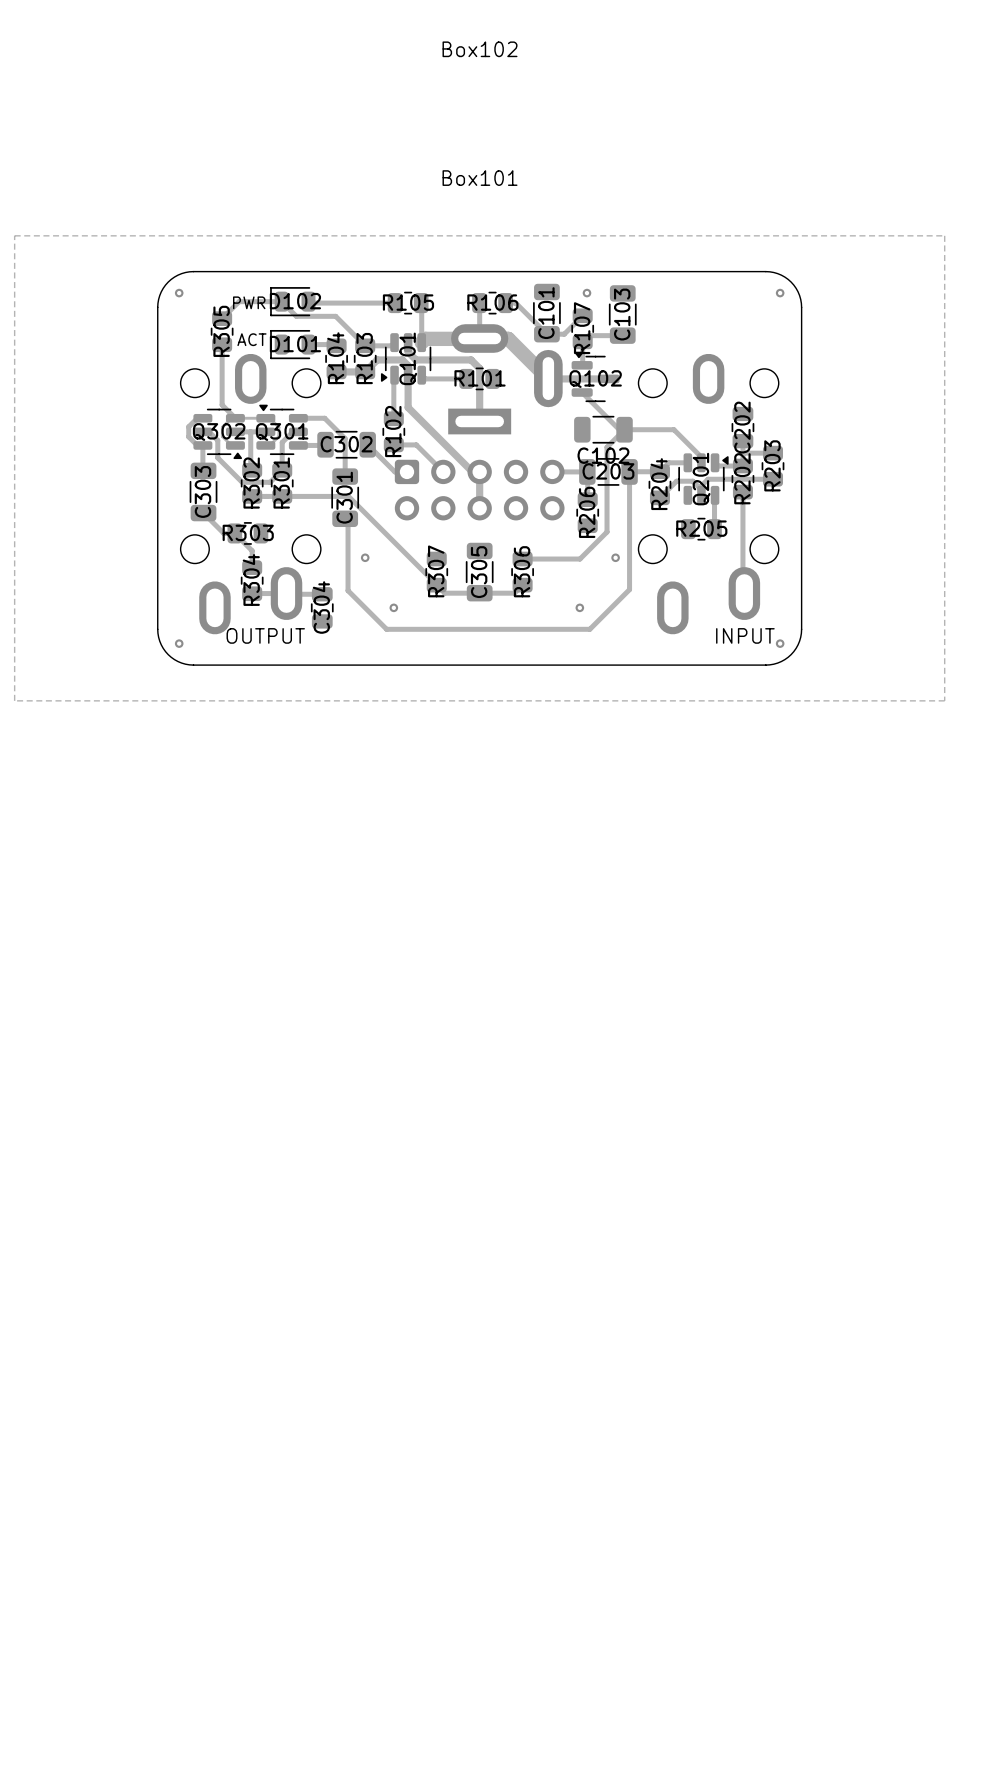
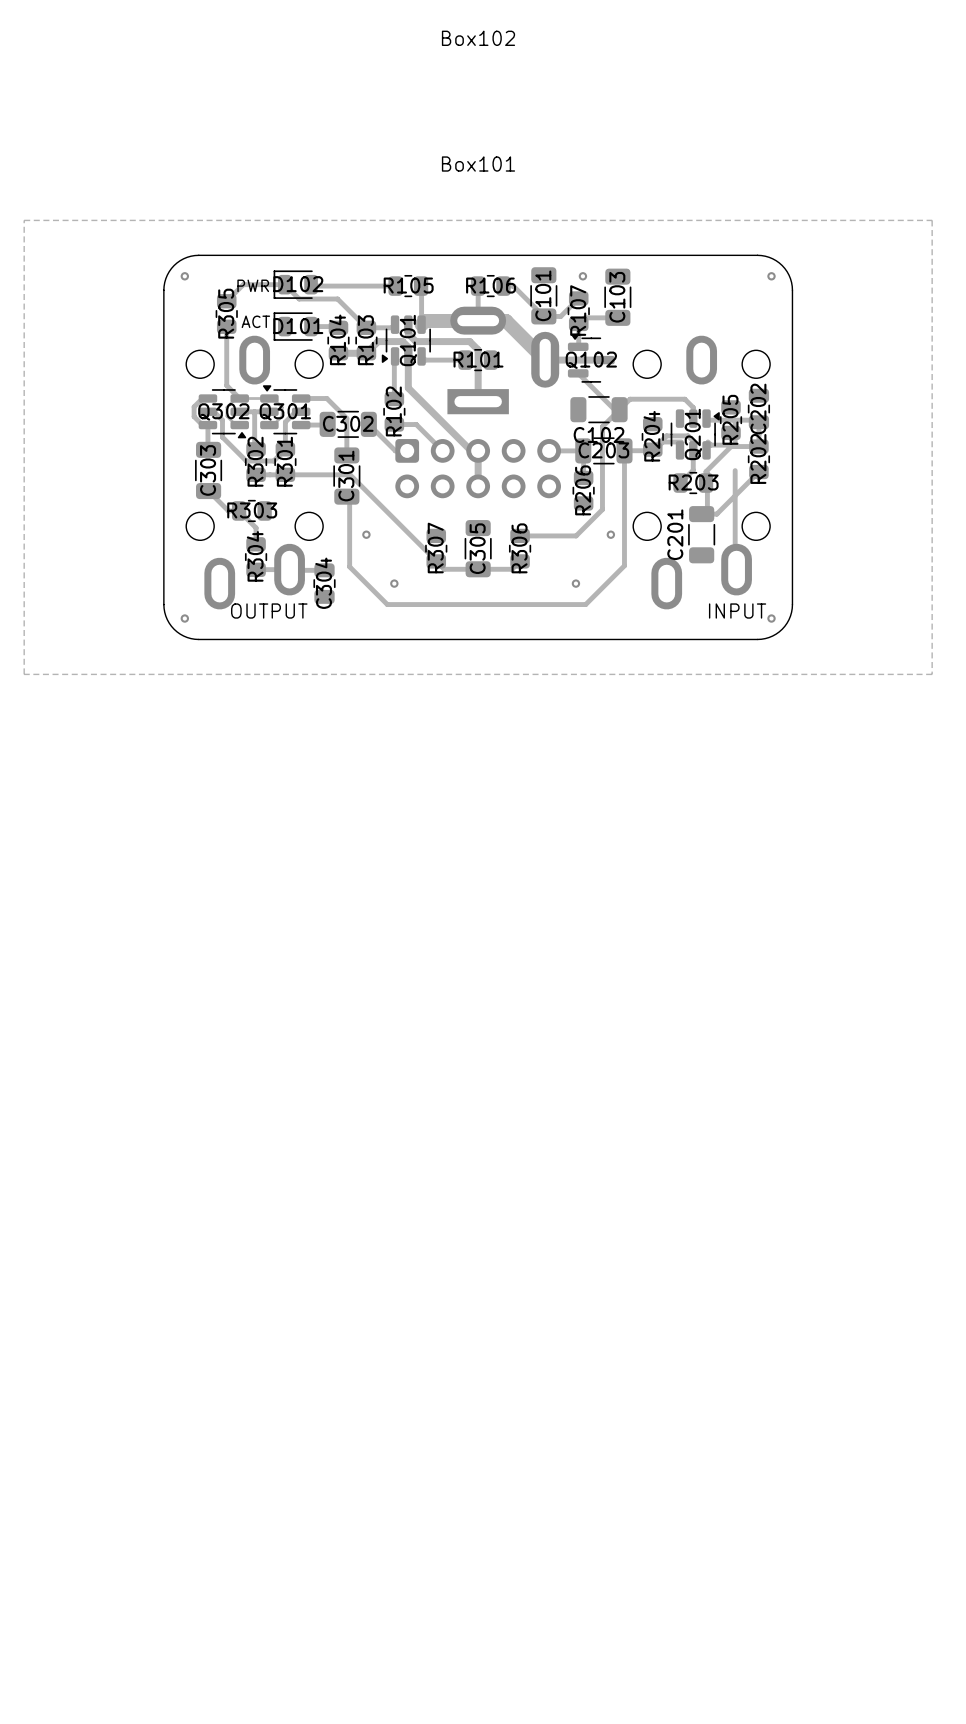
C202 position: (742, 427) -> (758, 408)
track: (624, 429) (673, 429) (701, 457) (701, 462) -> (619, 409) (630, 399) (684, 399) (693, 407) (693, 418)
track: none -> (706, 418) (708, 420) (756, 420) (758, 422) (758, 446) (731, 446) (706, 471) (706, 483)
track: (743, 453) (772, 453) -> none
R203 rotation: 0° (772, 466) -> 90° clockwise (693, 483)
R203 position: (772, 466) -> (693, 483)
track: none -> (652, 449) (666, 435) (688, 435) (693, 441) (693, 470) (680, 483)
Q201 position: (703, 479) -> (695, 434)
R202 position: (742, 479) -> (758, 459)
track: (772, 479) (708, 479) (701, 485) (701, 495) -> none
R204 position: (659, 484) -> (652, 436)
track: (701, 489) (692, 481) (676, 481) (659, 497) -> none
track: none -> (758, 472) (716, 514) (701, 514)
R205 rotation: 0° (701, 529) -> 90° clockwise (730, 420)
R205 position: (701, 529) -> (730, 420)
C201: none -> (701, 534)

